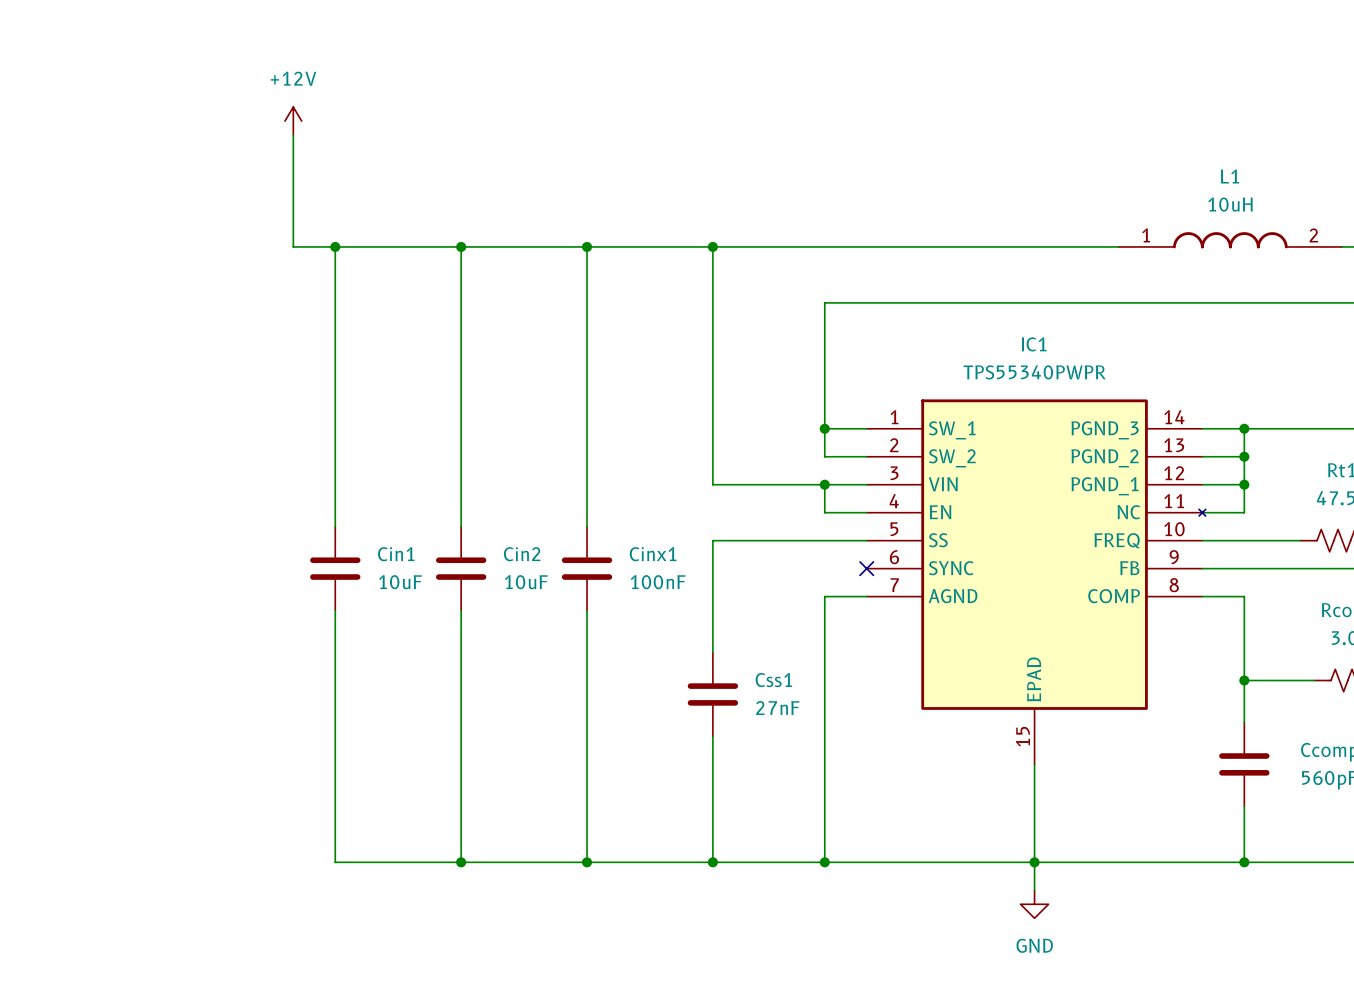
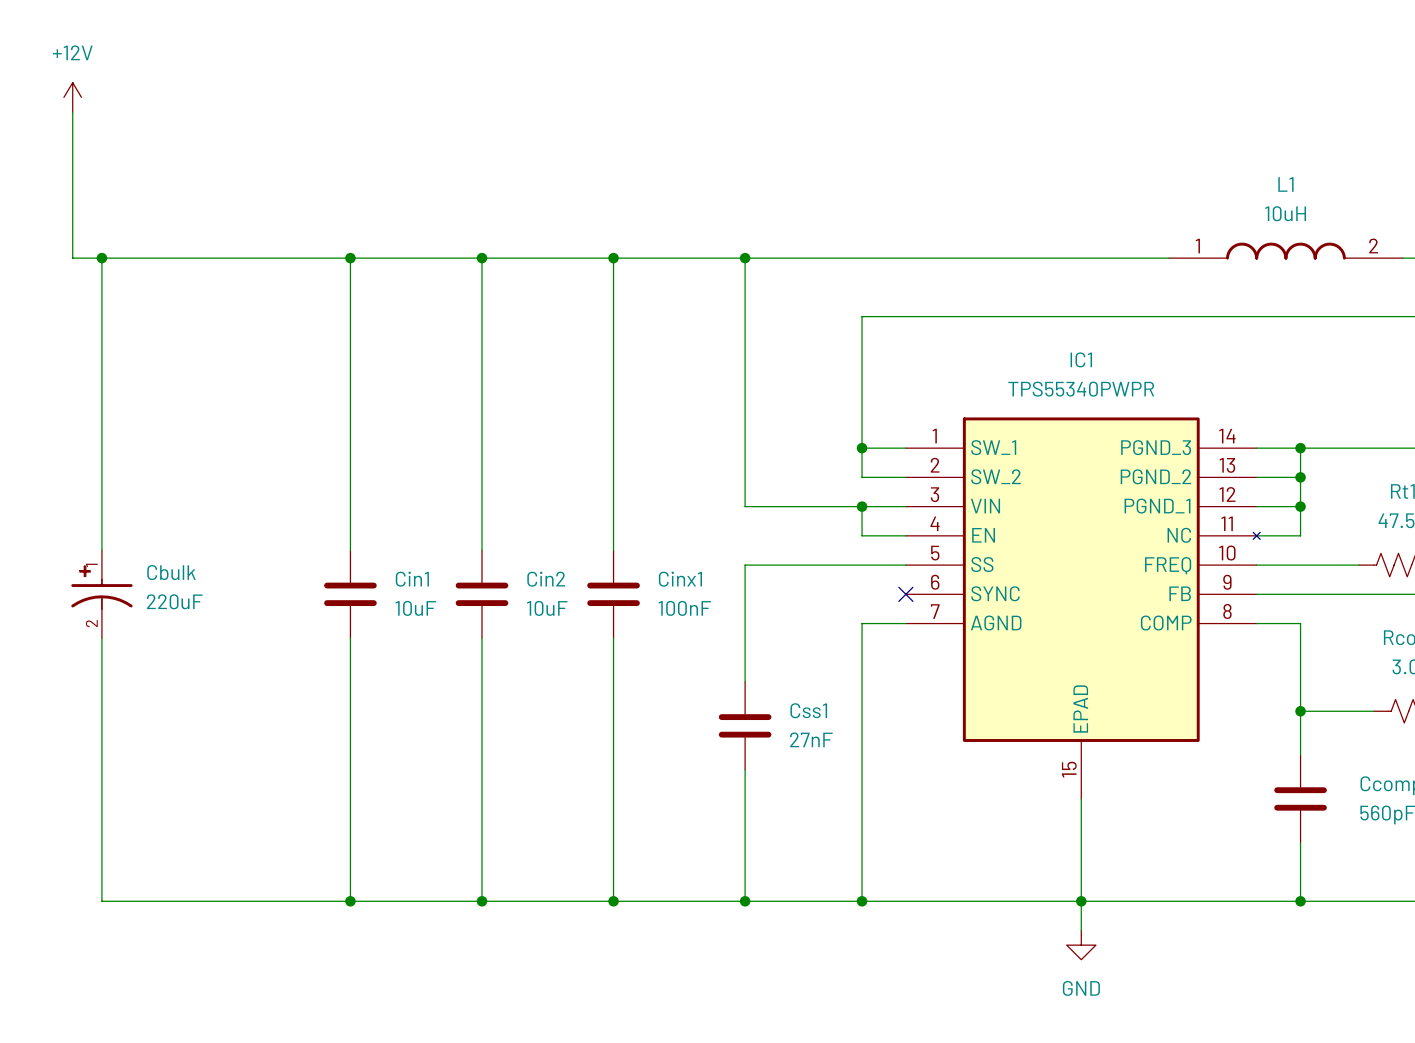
power symbol position: +12V (293, 121) -> +12V (72, 97)
wire: (293, 135) (293, 246) -> (72, 111) (72, 258) (306, 258)
wire: none -> (101, 258) (101, 550)
junction: none -> (101, 258)
Cbulk: none -> 220uF (101, 594)
wire: none -> (101, 638) (101, 901) (350, 901)
junction: none -> (350, 901)

